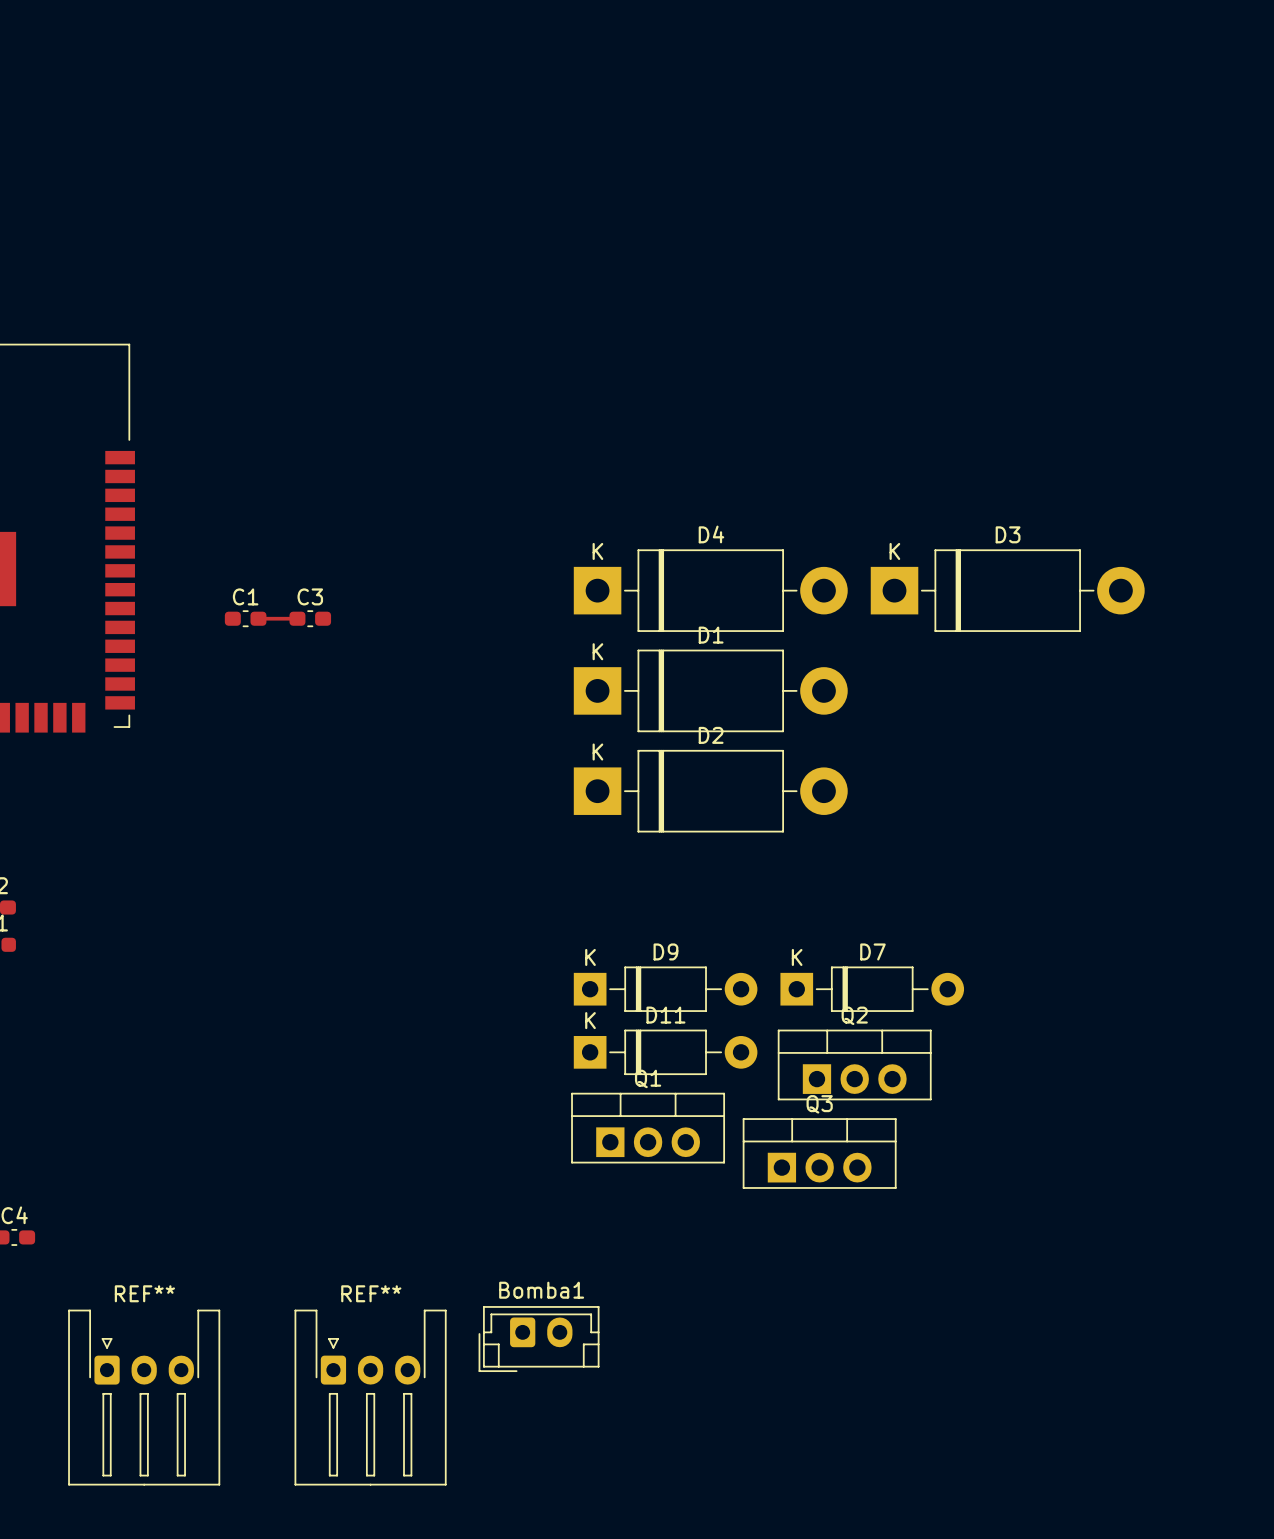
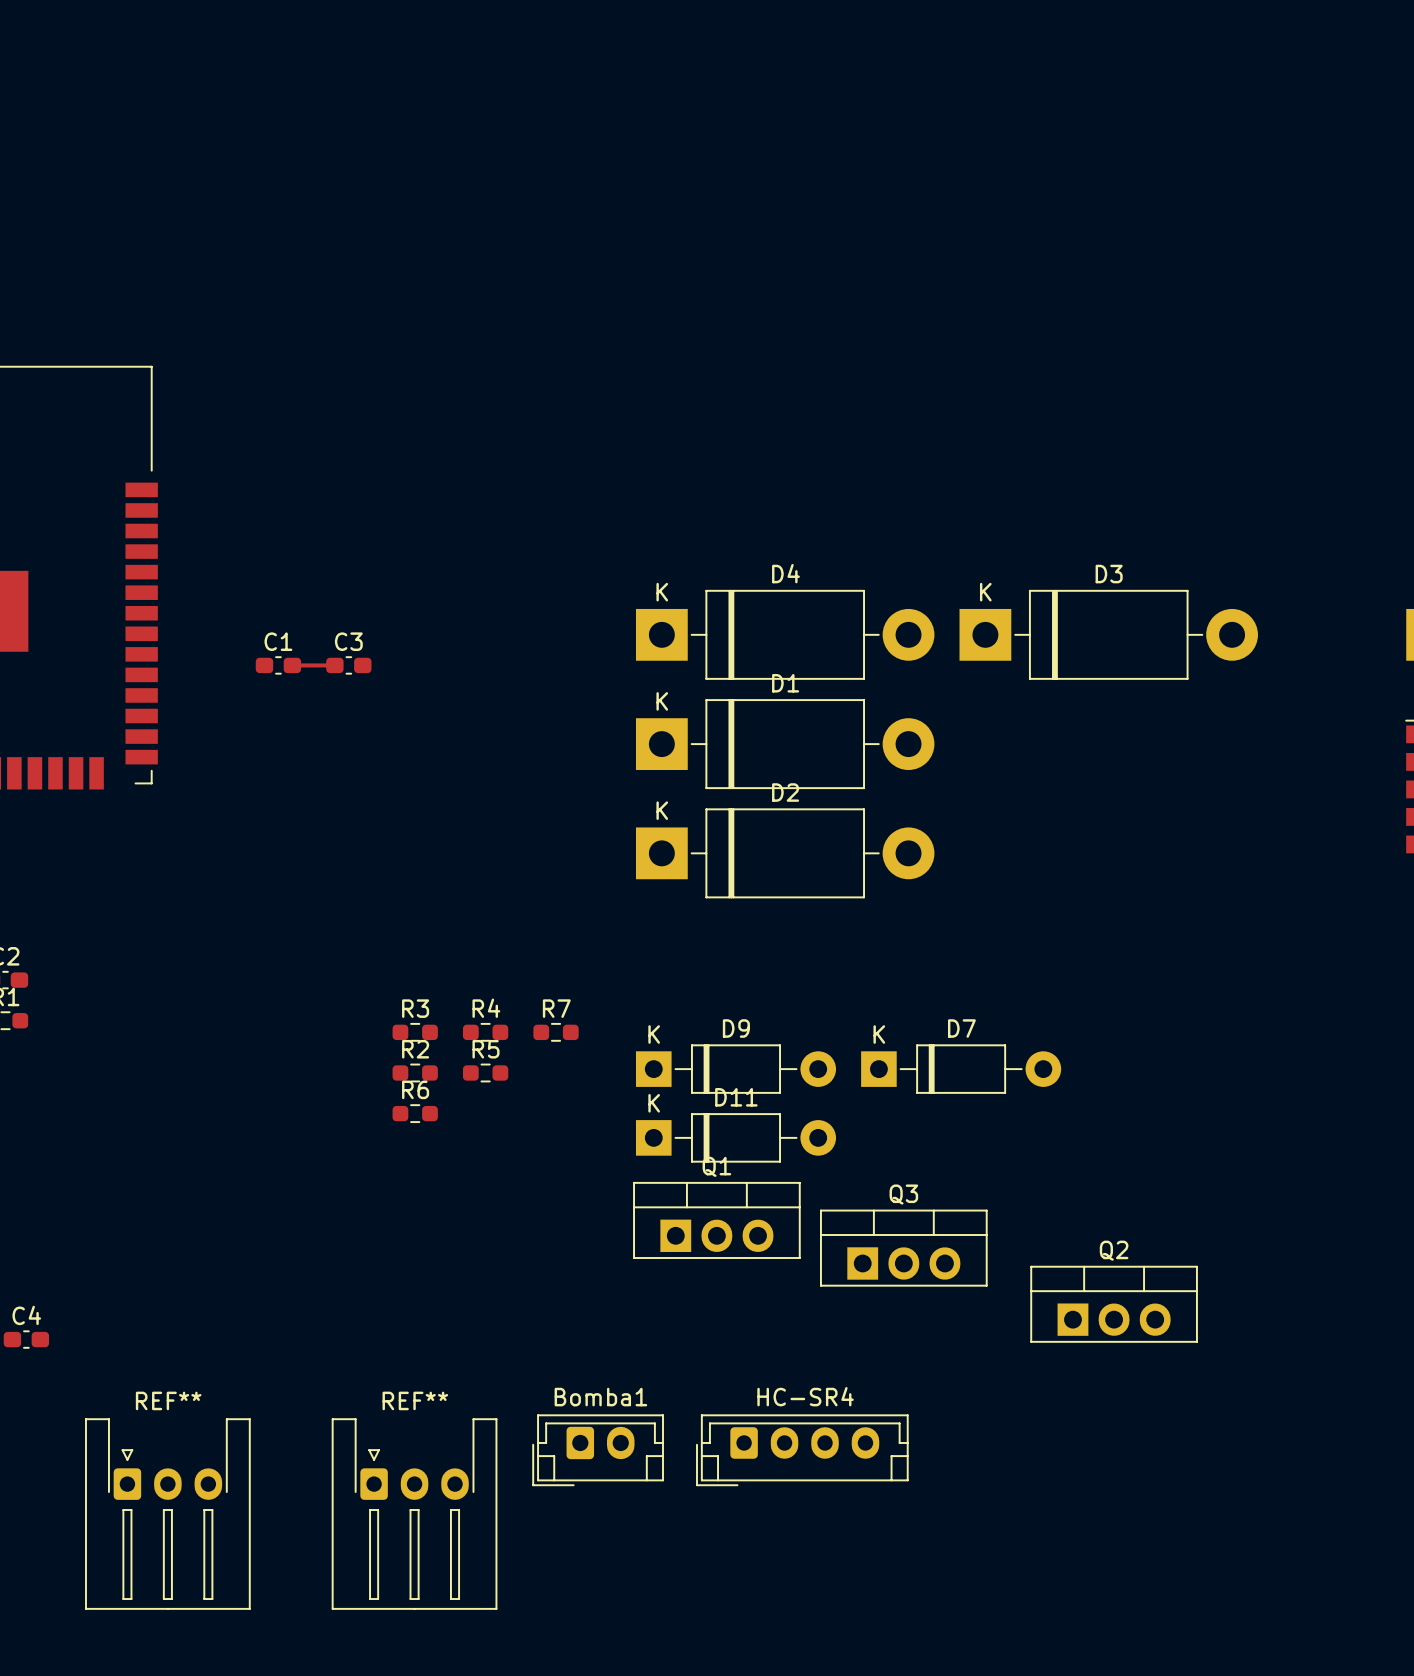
R3: none -> (415, 1032)
R4: none -> (485, 1032)
R7: none -> (556, 1032)
R2: none -> (415, 1072)
R5: none -> (485, 1072)
R6: none -> (415, 1113)
Q2 position: (854, 1064) -> (1114, 1304)
HC-SR4: none -> (802, 1450)

